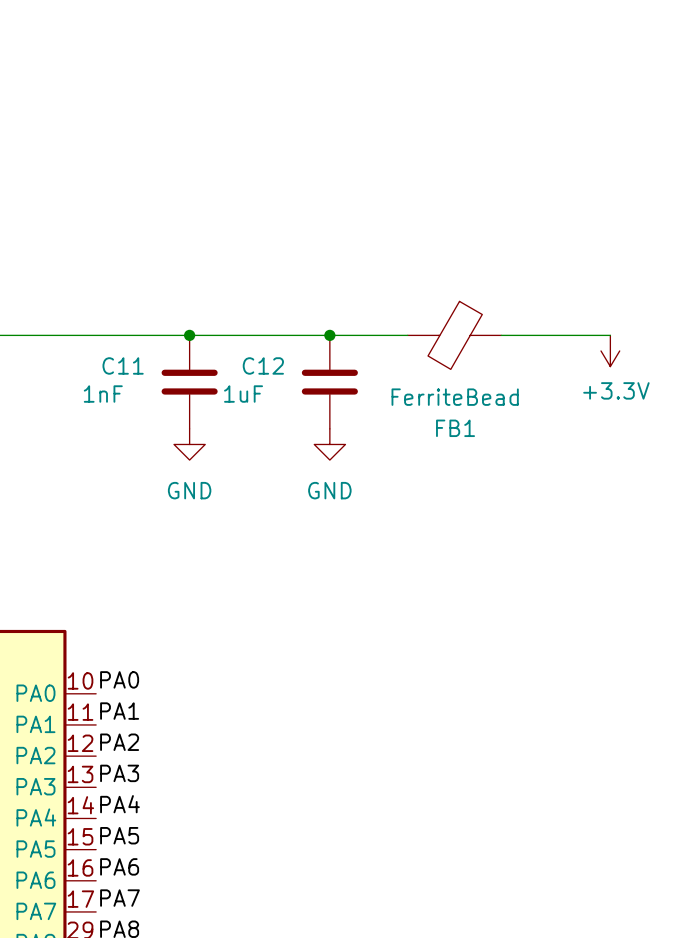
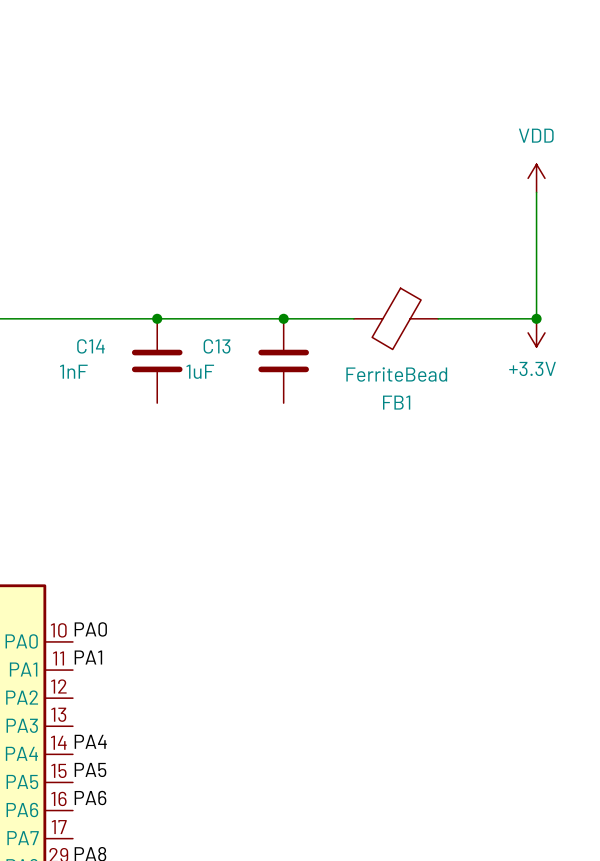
power symbol: none -> VDD (536, 178)
wire: none -> (536, 192) (536, 318)
junction: none -> (536, 318)
C11 name: C11 (123, 365) -> C14 (90, 346)
C12 name: C12 (263, 365) -> C13 (217, 346)
power symbol: GND (189, 444) -> none
power symbol: GND (329, 444) -> none
label: PA2 (119, 742) -> none
label: PA3 (119, 773) -> none
label: PA7 (119, 898) -> none

